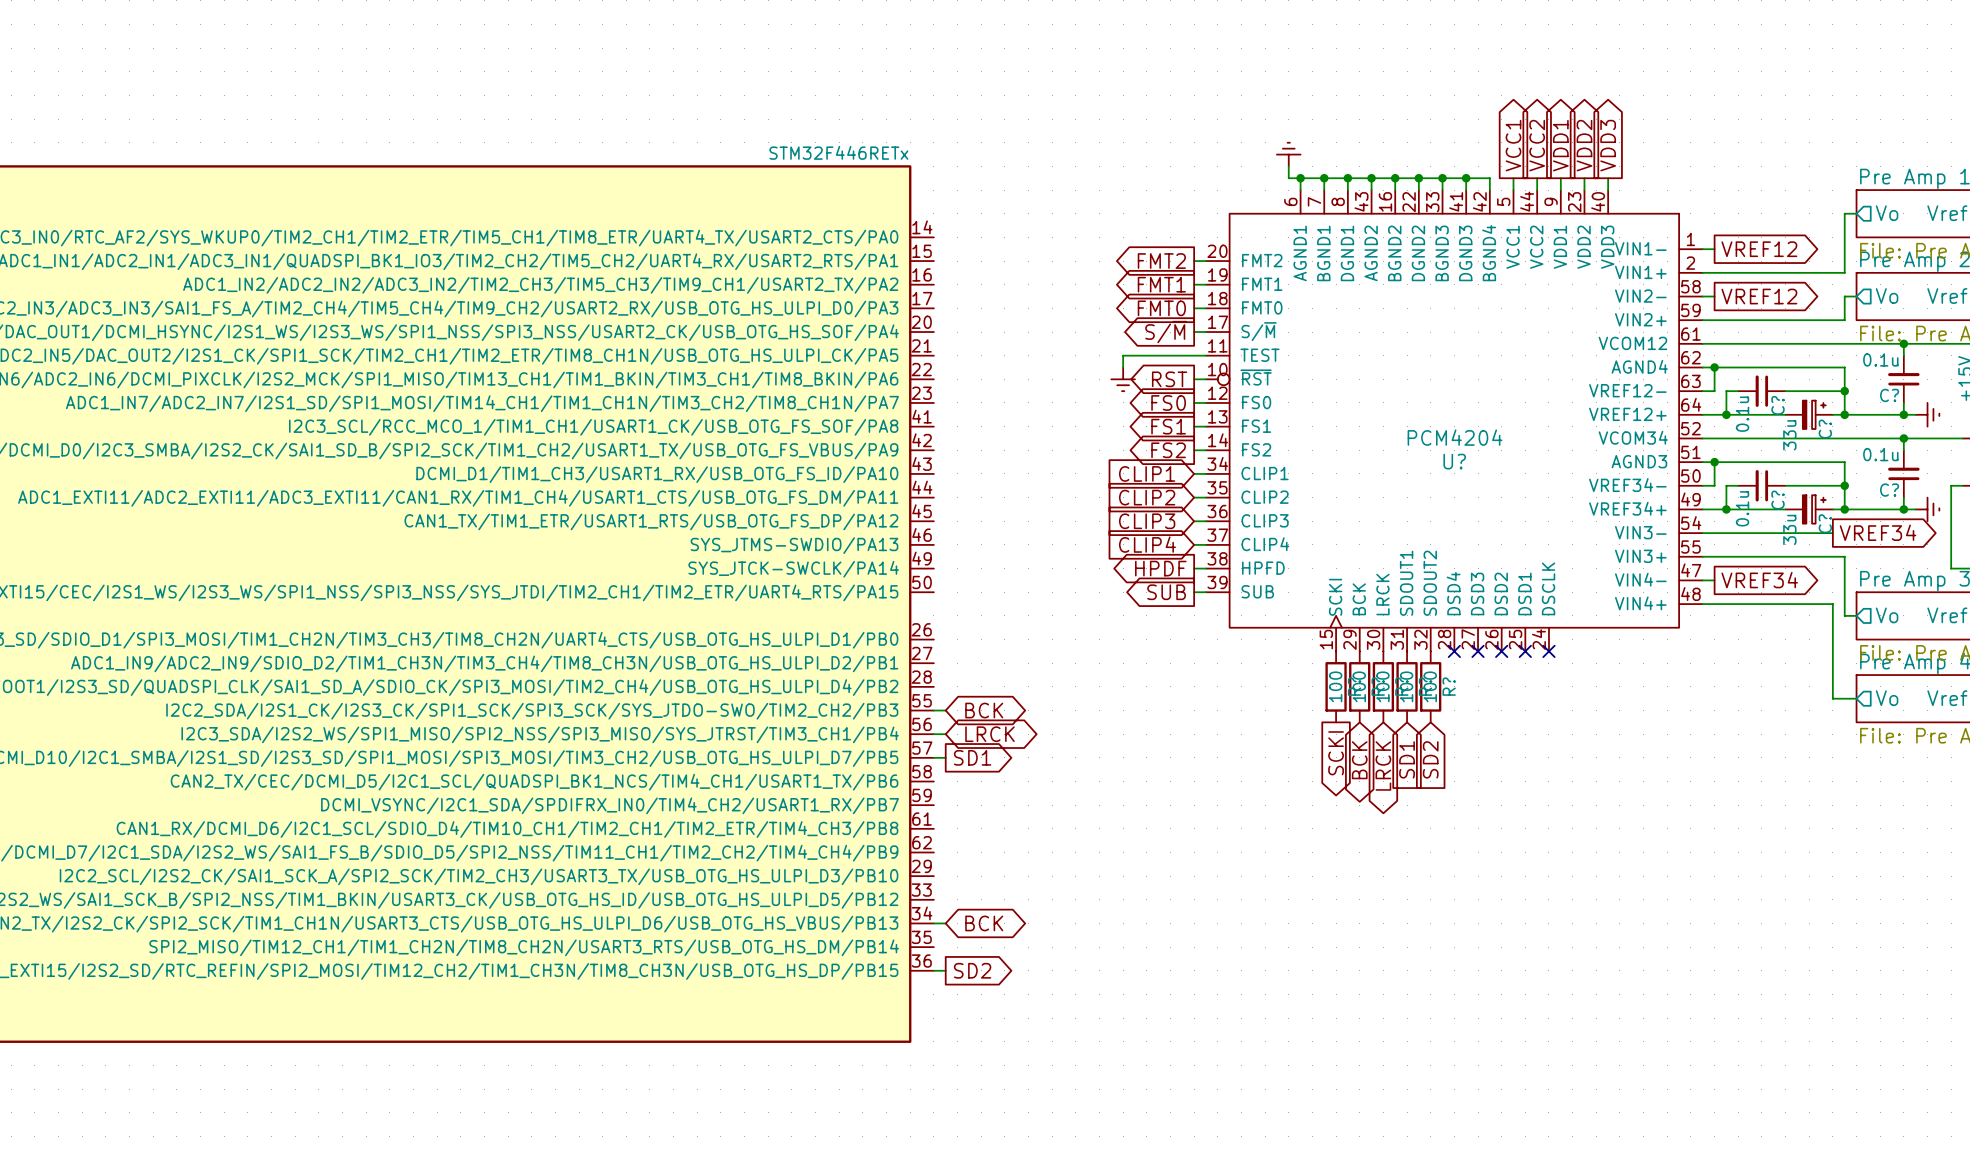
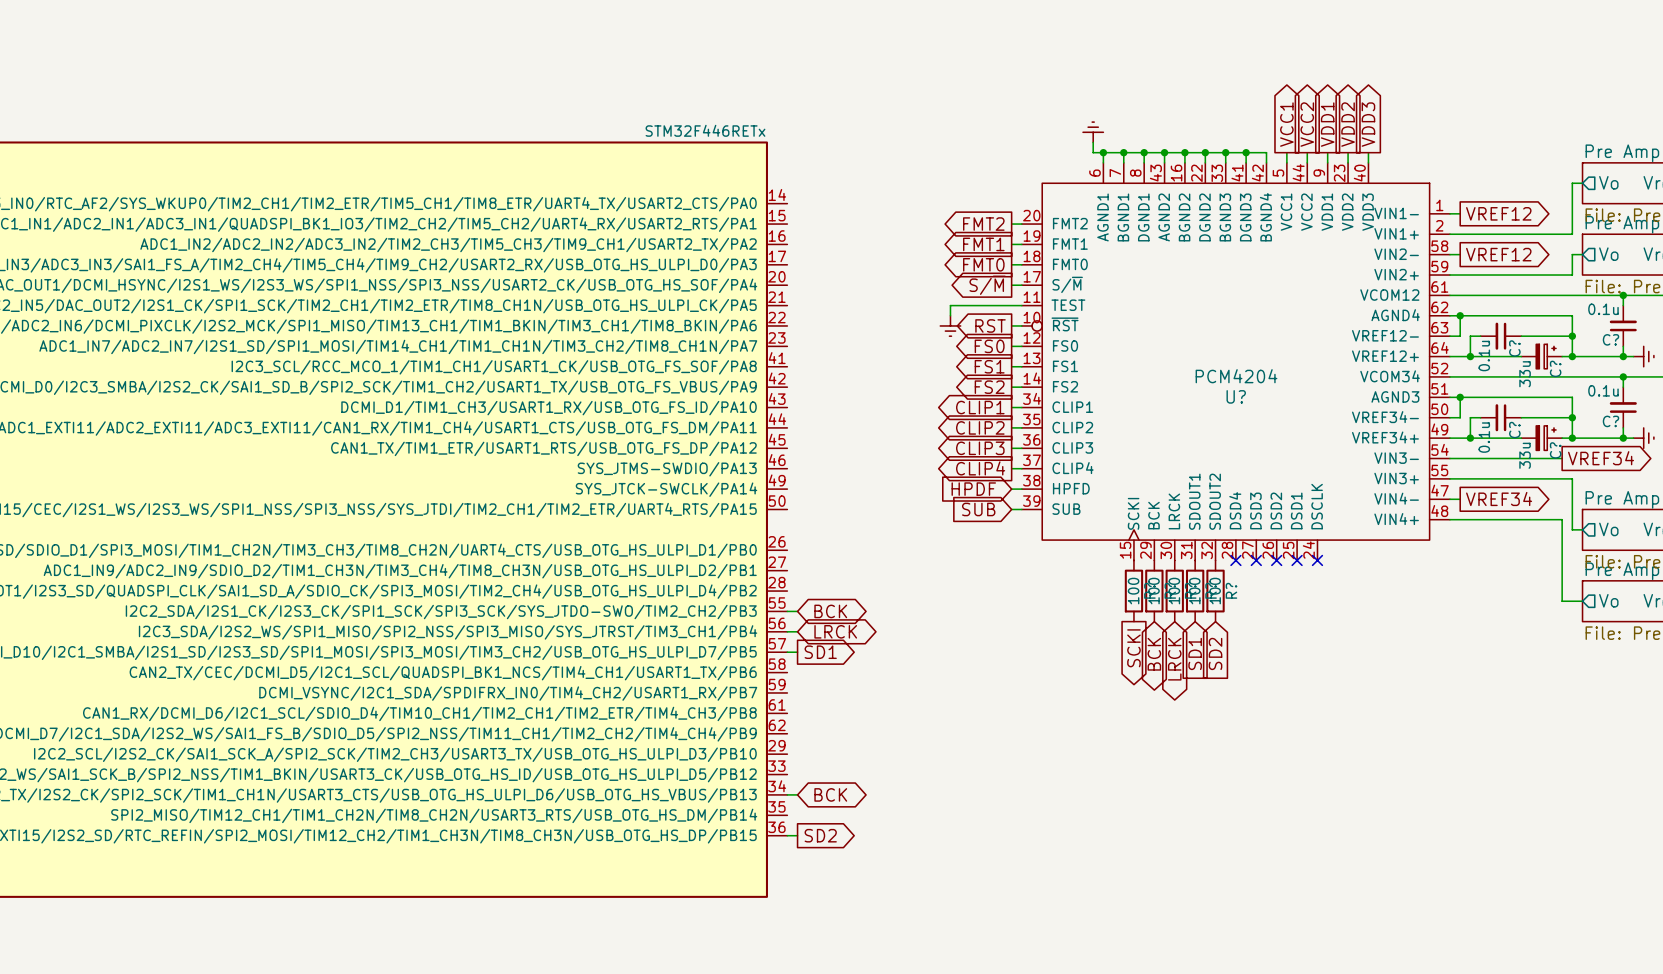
global label shape: input (1147, 473) -> output (980, 407)
global label shape: input (1147, 497) -> output (980, 427)
global label shape: input (1147, 521) -> output (980, 448)
global label shape: input (1147, 544) -> output (980, 468)
global label shape: output (1160, 568) -> input (973, 489)
global label shape: output (1166, 592) -> input (978, 509)

